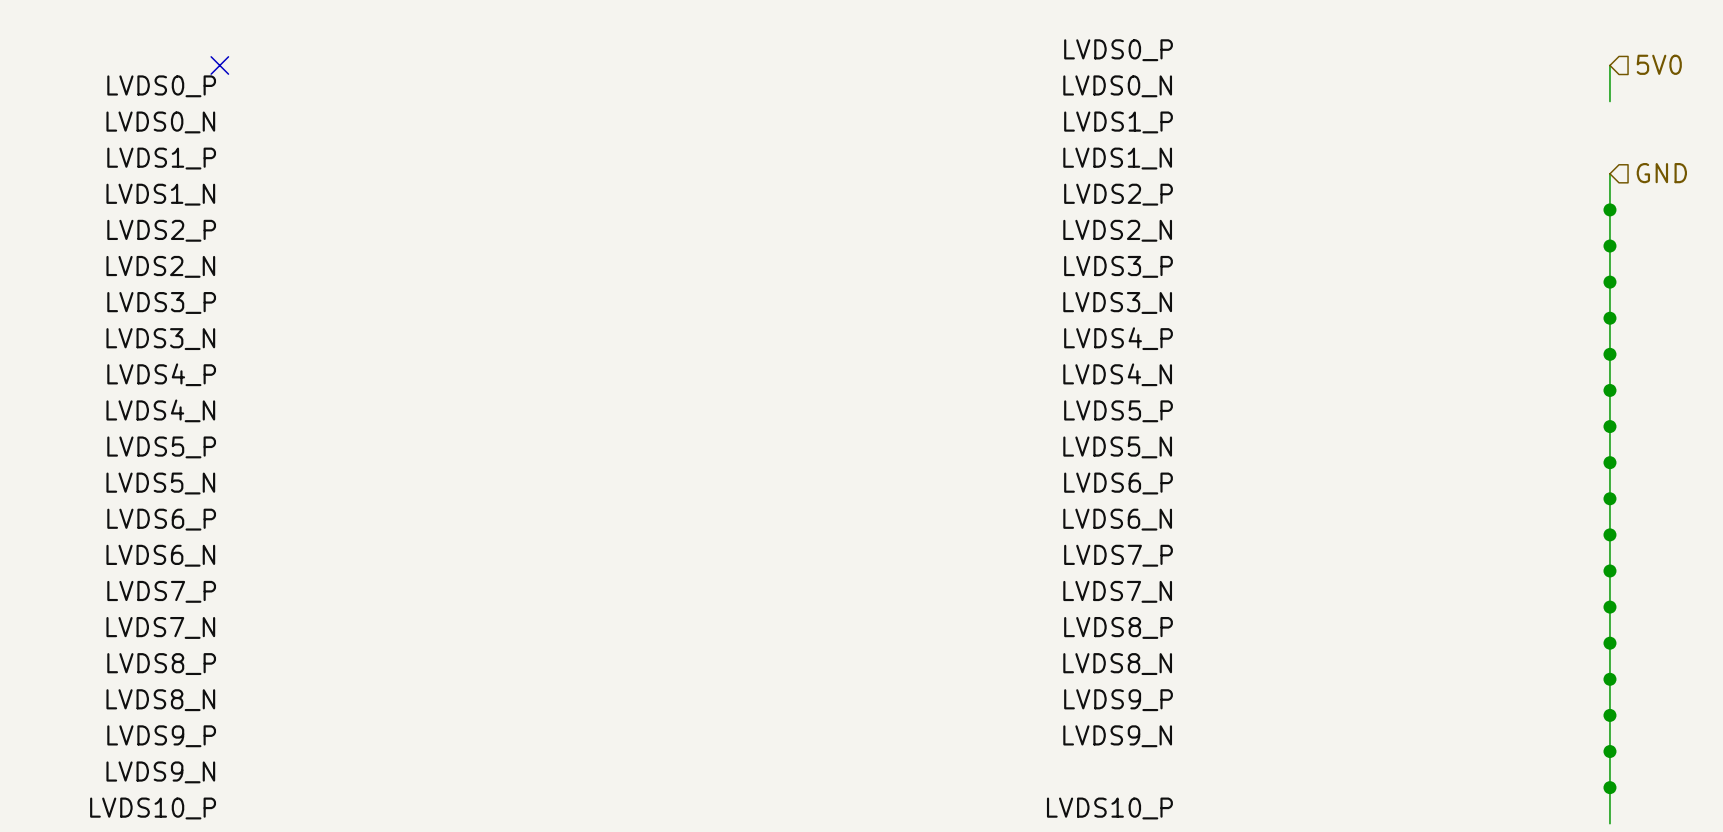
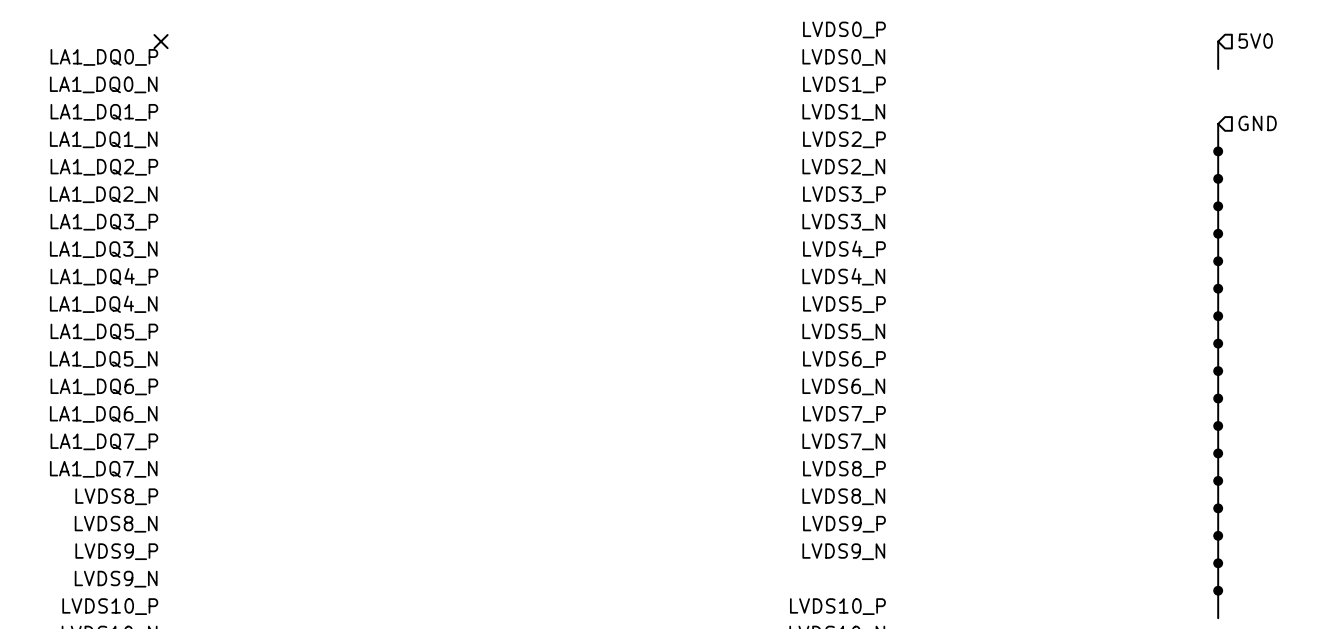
label: LVDS0_P (161, 86) -> LA1_DQ0_P (104, 57)
label: LVDS0_N (160, 122) -> LA1_DQ0_N (103, 84)
label: LVDS1_P (161, 158) -> LA1_DQ1_P (104, 112)
label: LVDS1_N (160, 194) -> LA1_DQ1_N (103, 139)
label: LVDS2_P (161, 230) -> LA1_DQ2_P (104, 167)
label: LVDS2_N (160, 266) -> LA1_DQ2_N (103, 194)
label: LVDS3_P (161, 302) -> LA1_DQ3_P (104, 222)
label: LVDS3_N (160, 339) -> LA1_DQ3_N (103, 249)
label: LVDS4_P (161, 374) -> LA1_DQ4_P (104, 276)
label: LVDS4_N (160, 410) -> LA1_DQ4_N (103, 304)
label: LVDS5_P (161, 447) -> LA1_DQ5_P (104, 332)
label: LVDS5_N (160, 483) -> LA1_DQ5_N (103, 359)
label: LVDS6_P (161, 519) -> LA1_DQ6_P (104, 386)
label: LVDS6_N (160, 555) -> LA1_DQ6_N (103, 414)
label: LVDS7_P (161, 591) -> LA1_DQ7_P (104, 441)
label: LVDS7_N (160, 627) -> LA1_DQ7_N (103, 469)

